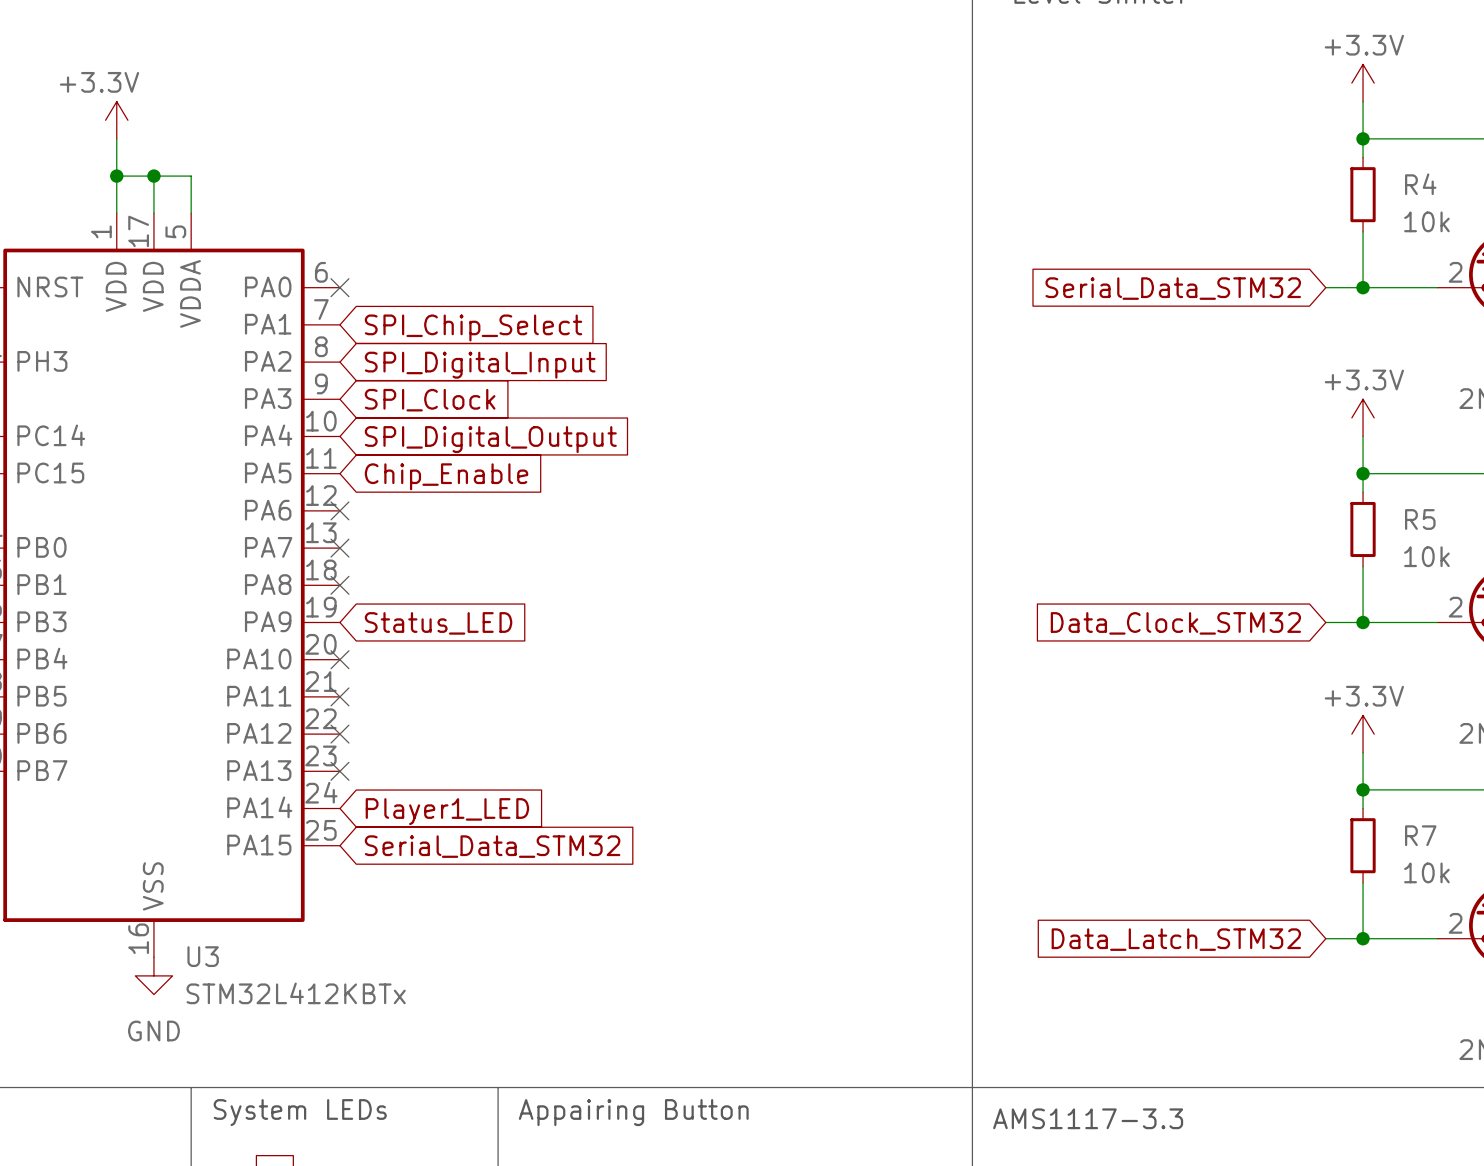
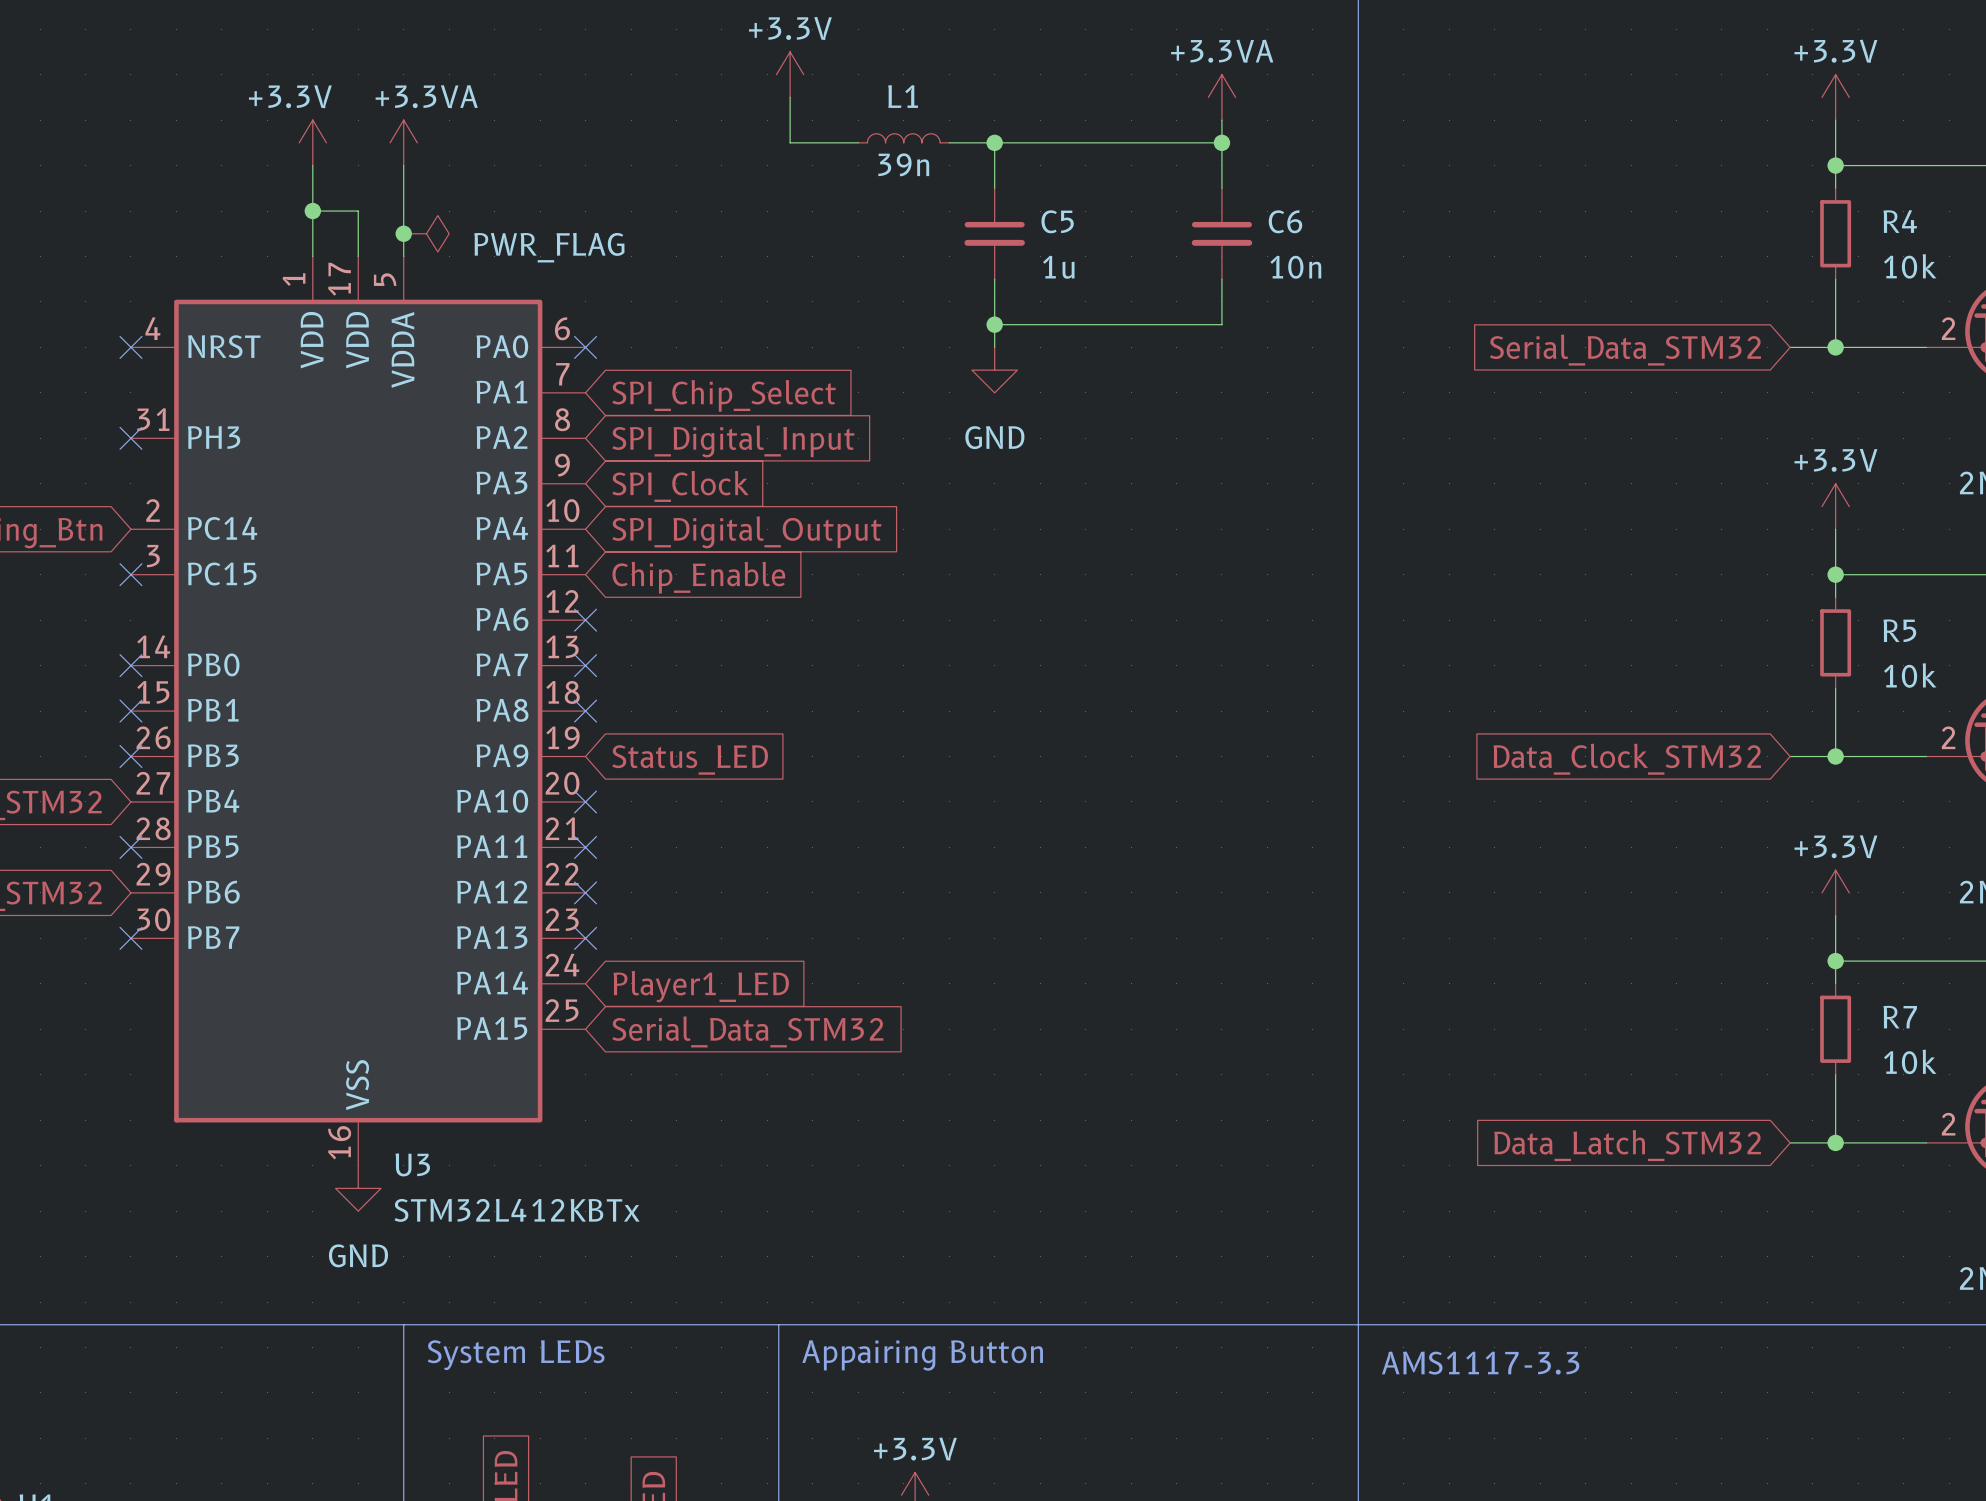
power symbol: none -> +3.3V (790, 74)
wire: none -> (790, 97) (790, 142) (858, 142)
power symbol: none -> +3.3VA (1221, 97)
wire: none -> (1221, 120) (1221, 188)
L1: none -> 39n (903, 138)
power symbol: none -> +3.3VA (403, 142)
wire: none -> (949, 142) (1221, 142)
wire: none -> (994, 142) (994, 188)
junction: none -> (994, 142)
junction: none -> (1221, 142)
wire: (153, 176) (191, 176) -> (403, 165) (403, 211)
junction position: (153, 176) -> (403, 233)
power symbol: none -> PWR_FLAG (426, 233)
C5: none -> 1u (994, 233)
C6: none -> 10n (1221, 233)
wire: none -> (994, 279) (994, 347)
wire: none -> (1221, 279) (1221, 324) (994, 324)
junction: none -> (994, 324)
power symbol: none -> GND (994, 370)

